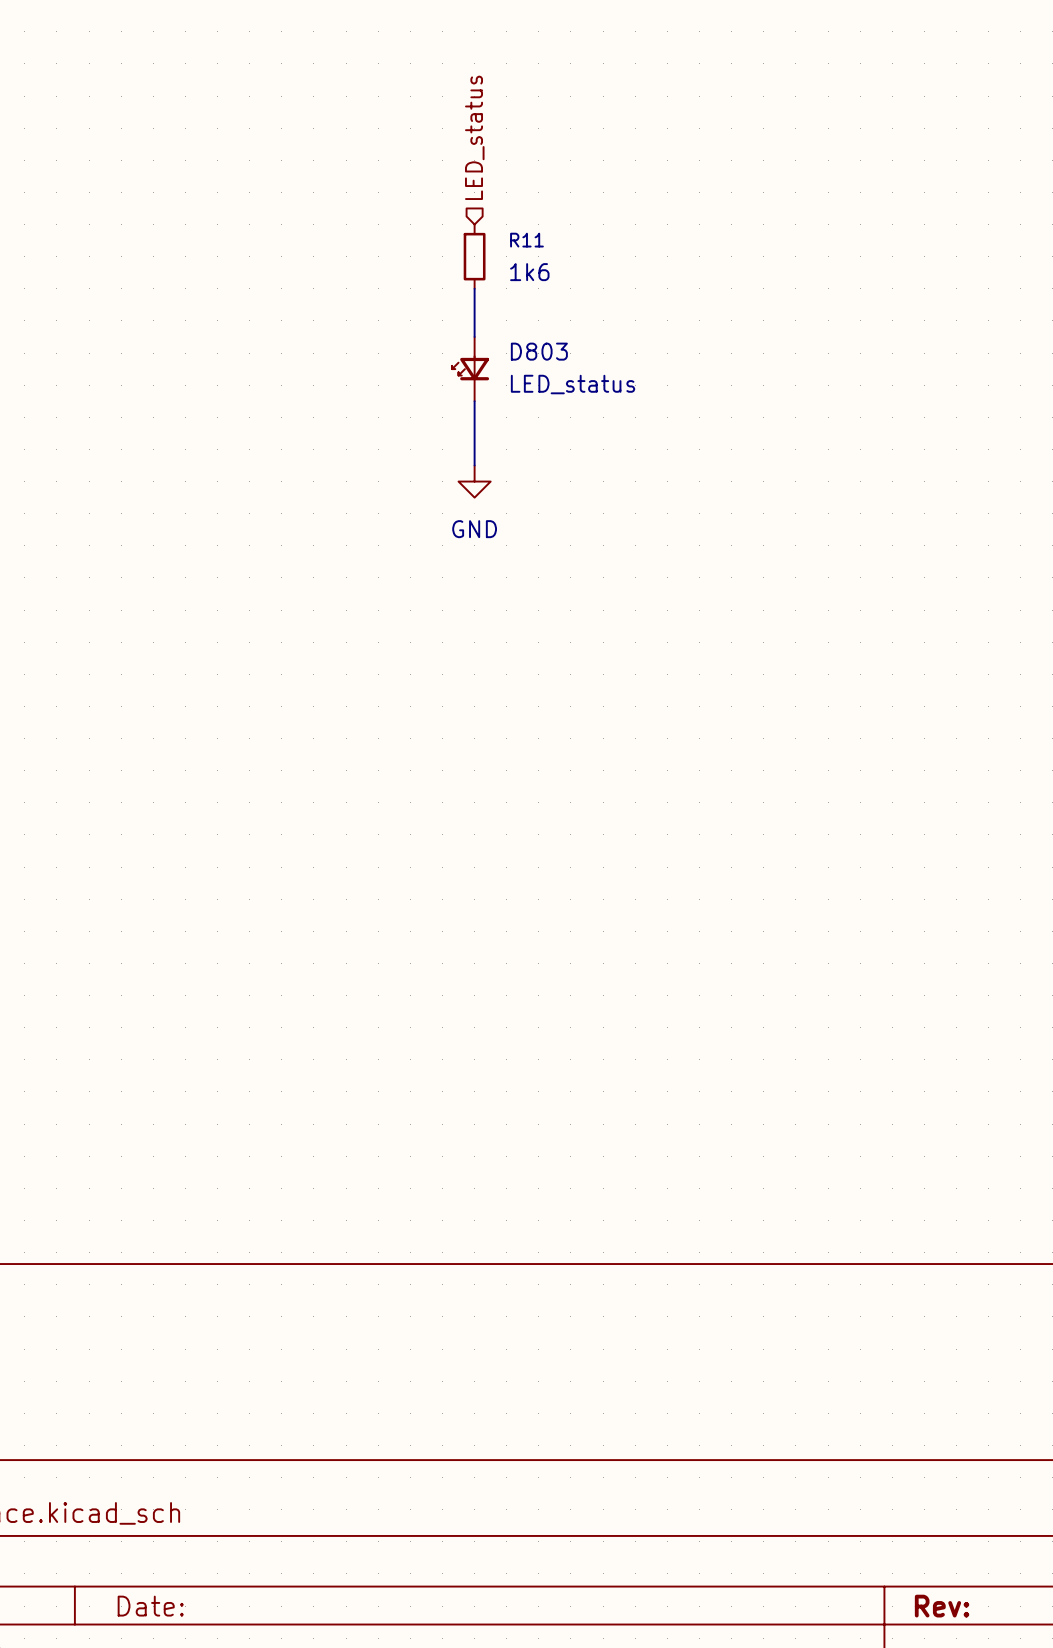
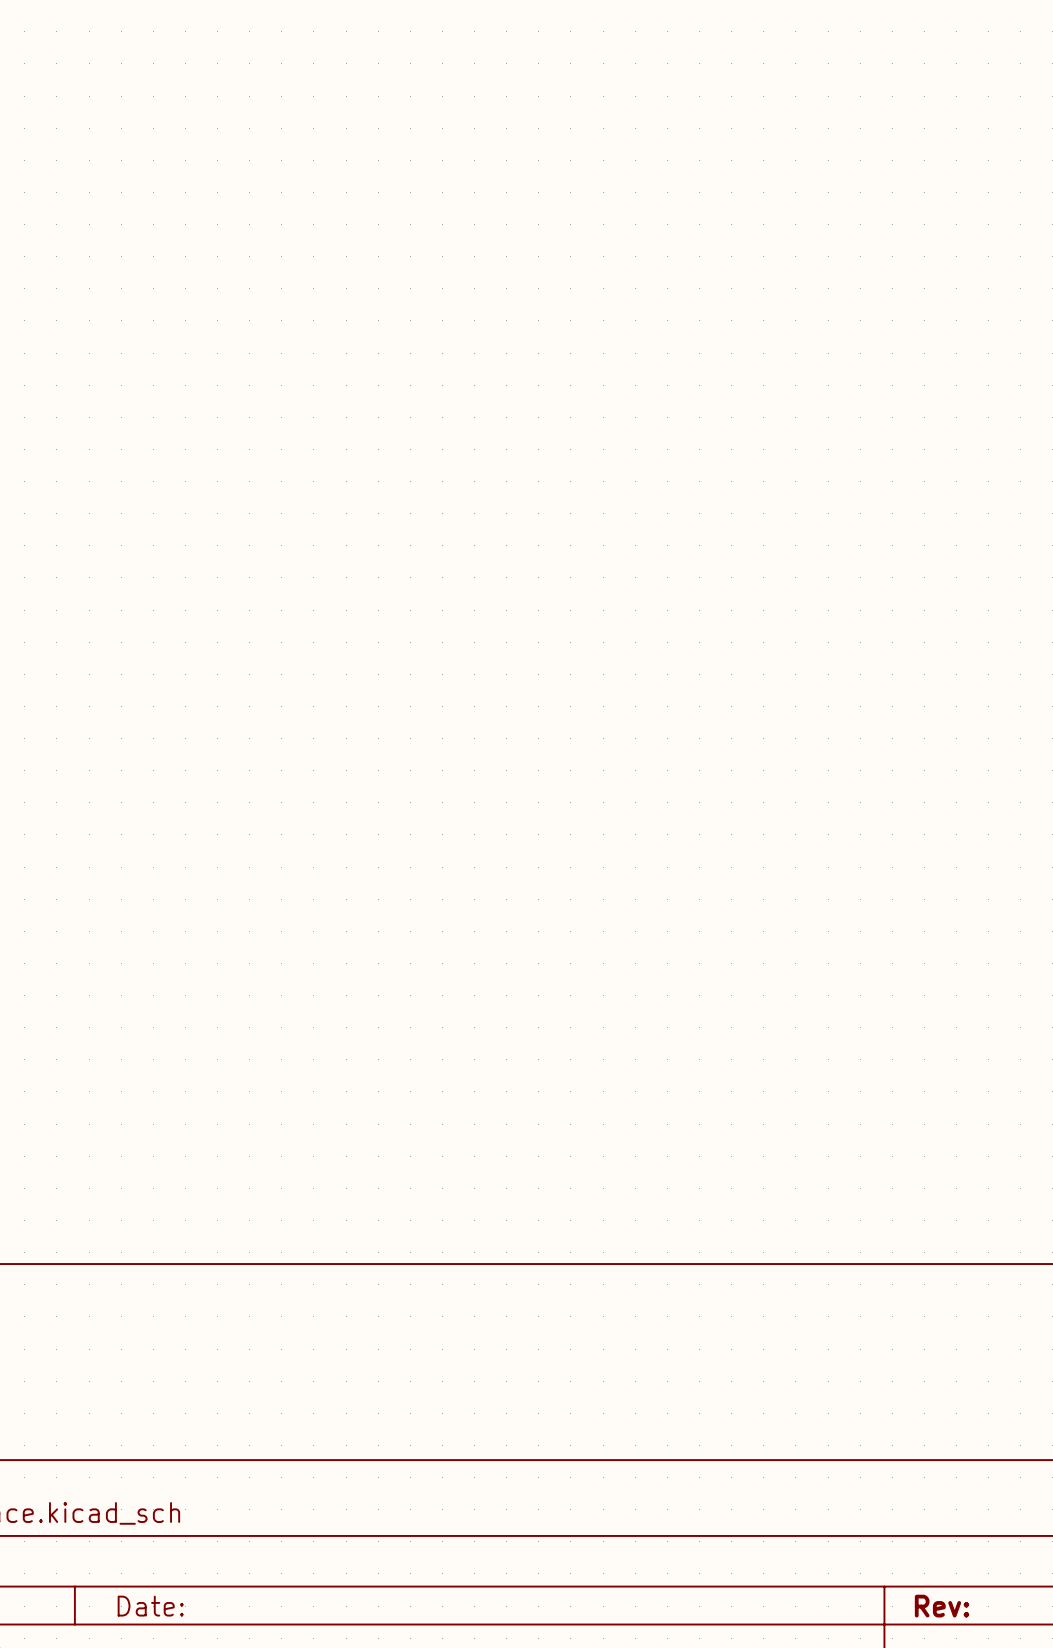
hierarchical label: LED_status (474, 137) -> none
R11: 1k6 (474, 256) -> none
wire: (474, 288) (474, 336) -> none
D803: LED_status (470, 369) -> none
wire: (474, 401) (474, 465) -> none
power symbol: GND (474, 481) -> none

